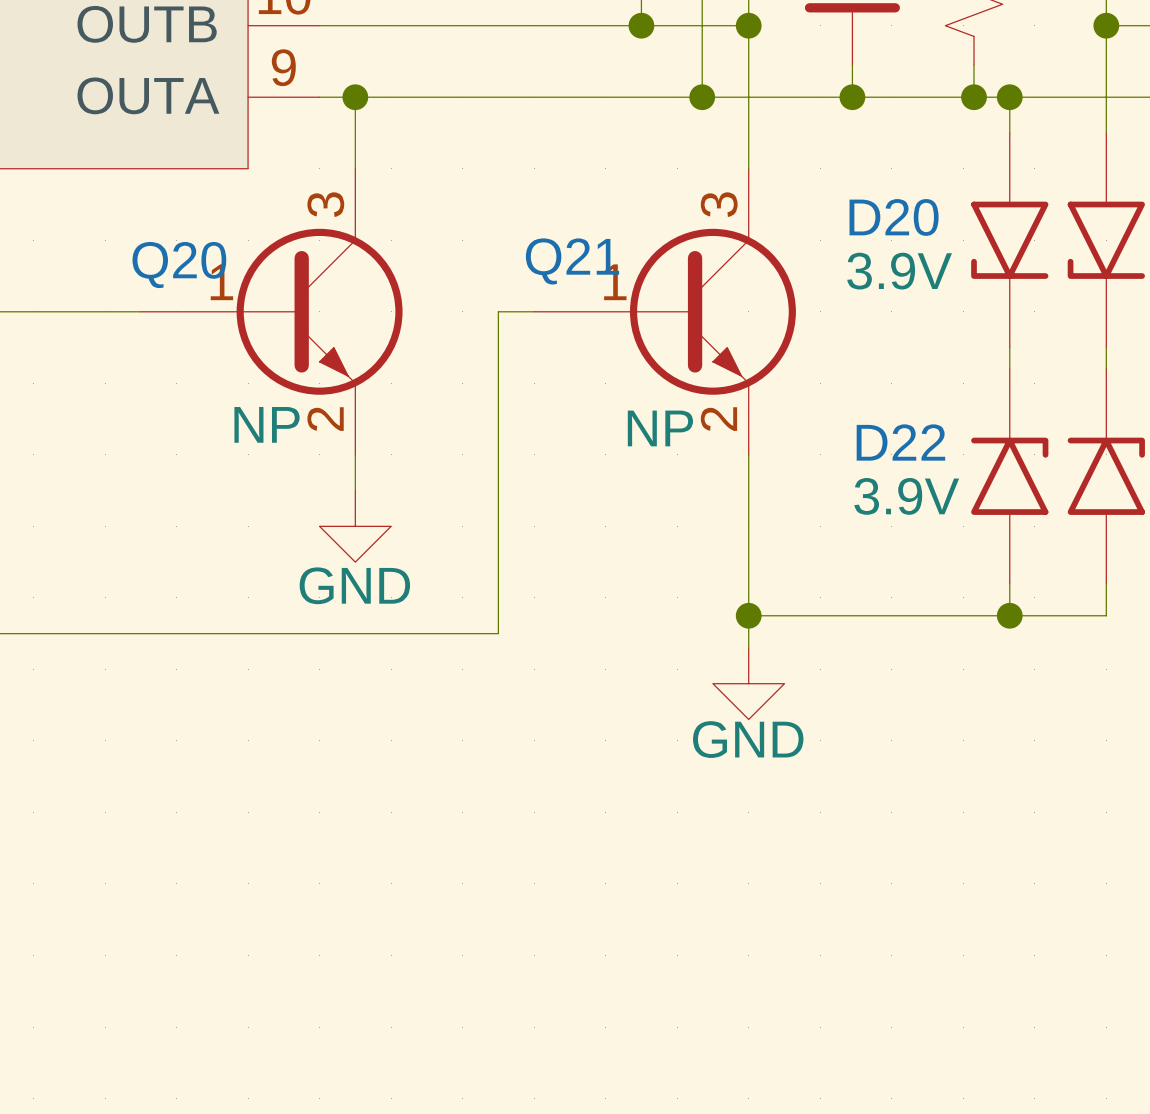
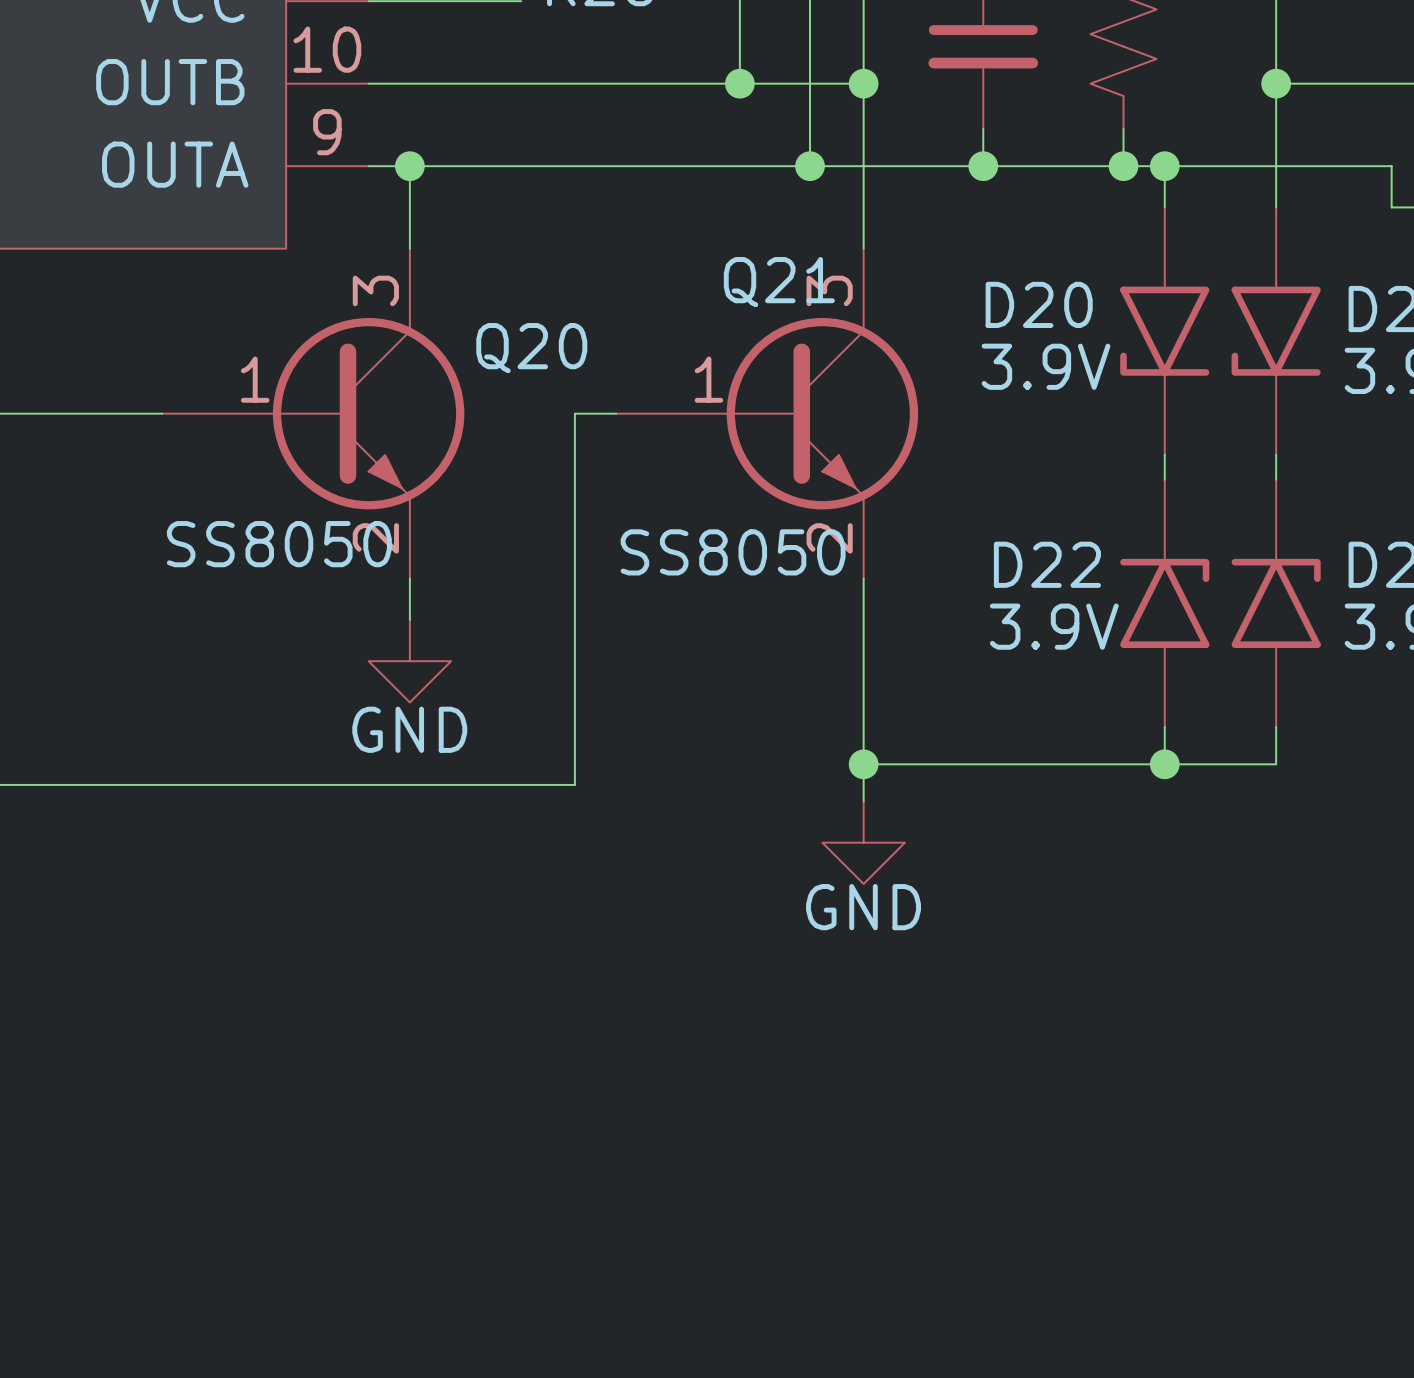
Q21 name position: Q21 (572, 261) -> Q21 (779, 282)
Q20 name position: Q20 (179, 265) -> Q20 (531, 348)
Q20 value: NP (267, 424) -> SS8050 (279, 544)
Q21 value: NP (660, 428) -> SS8050 (733, 552)

